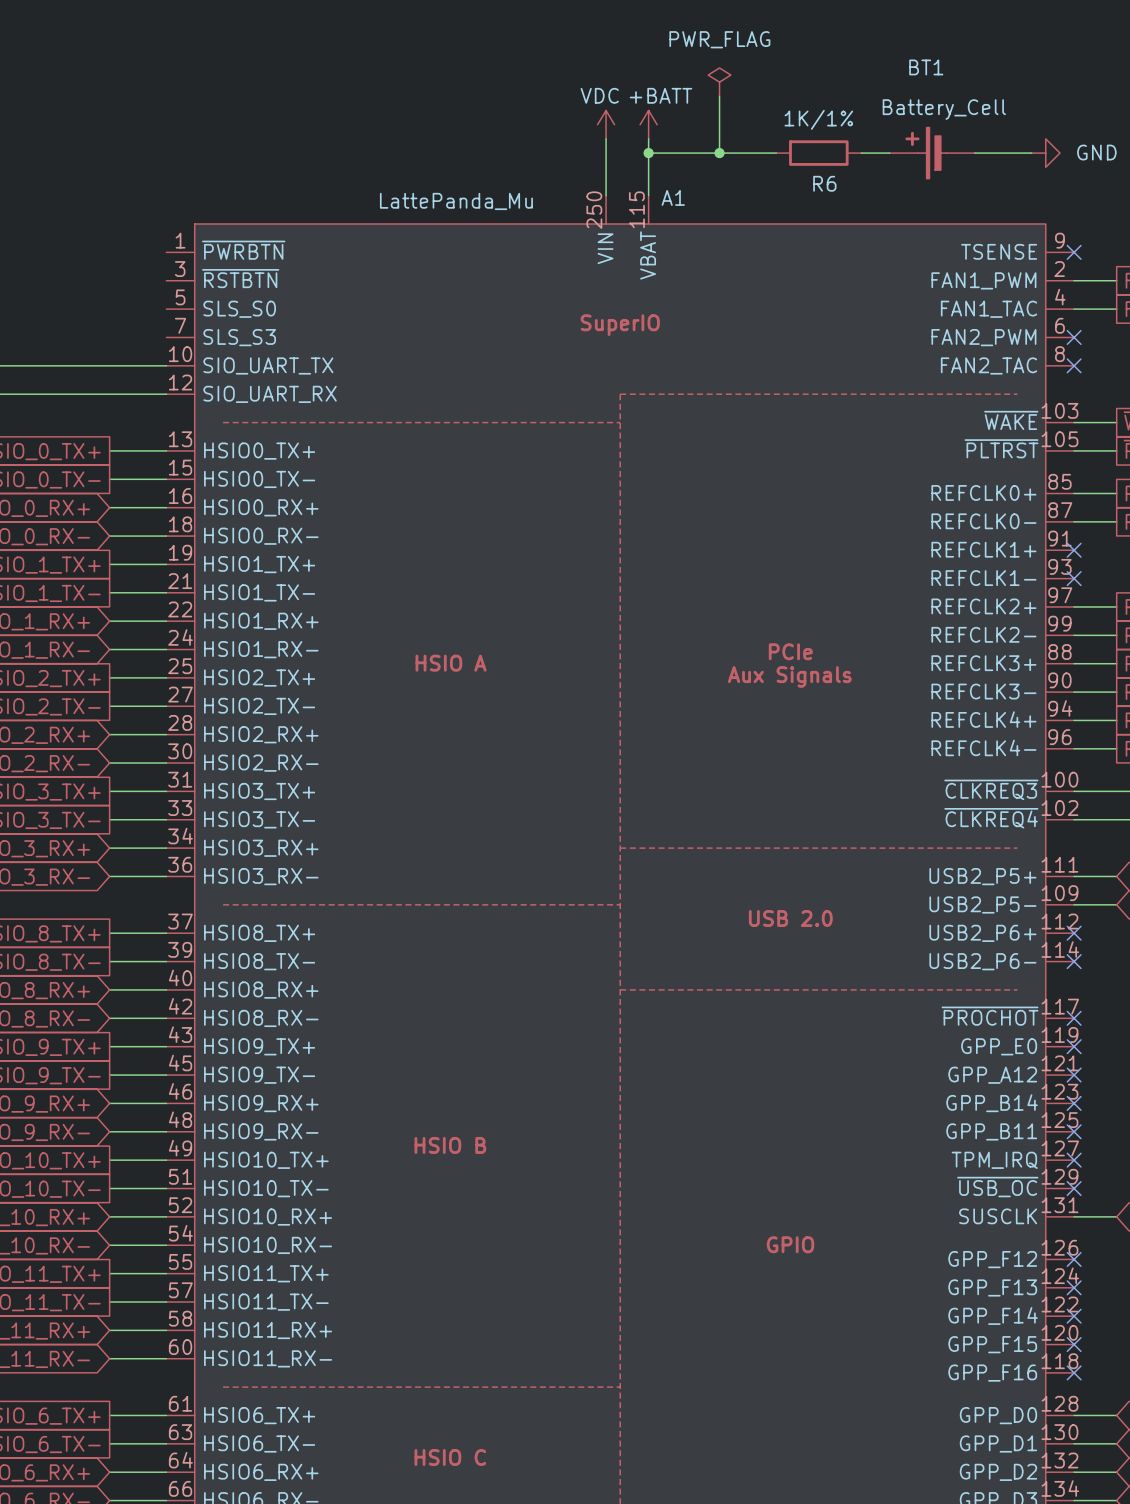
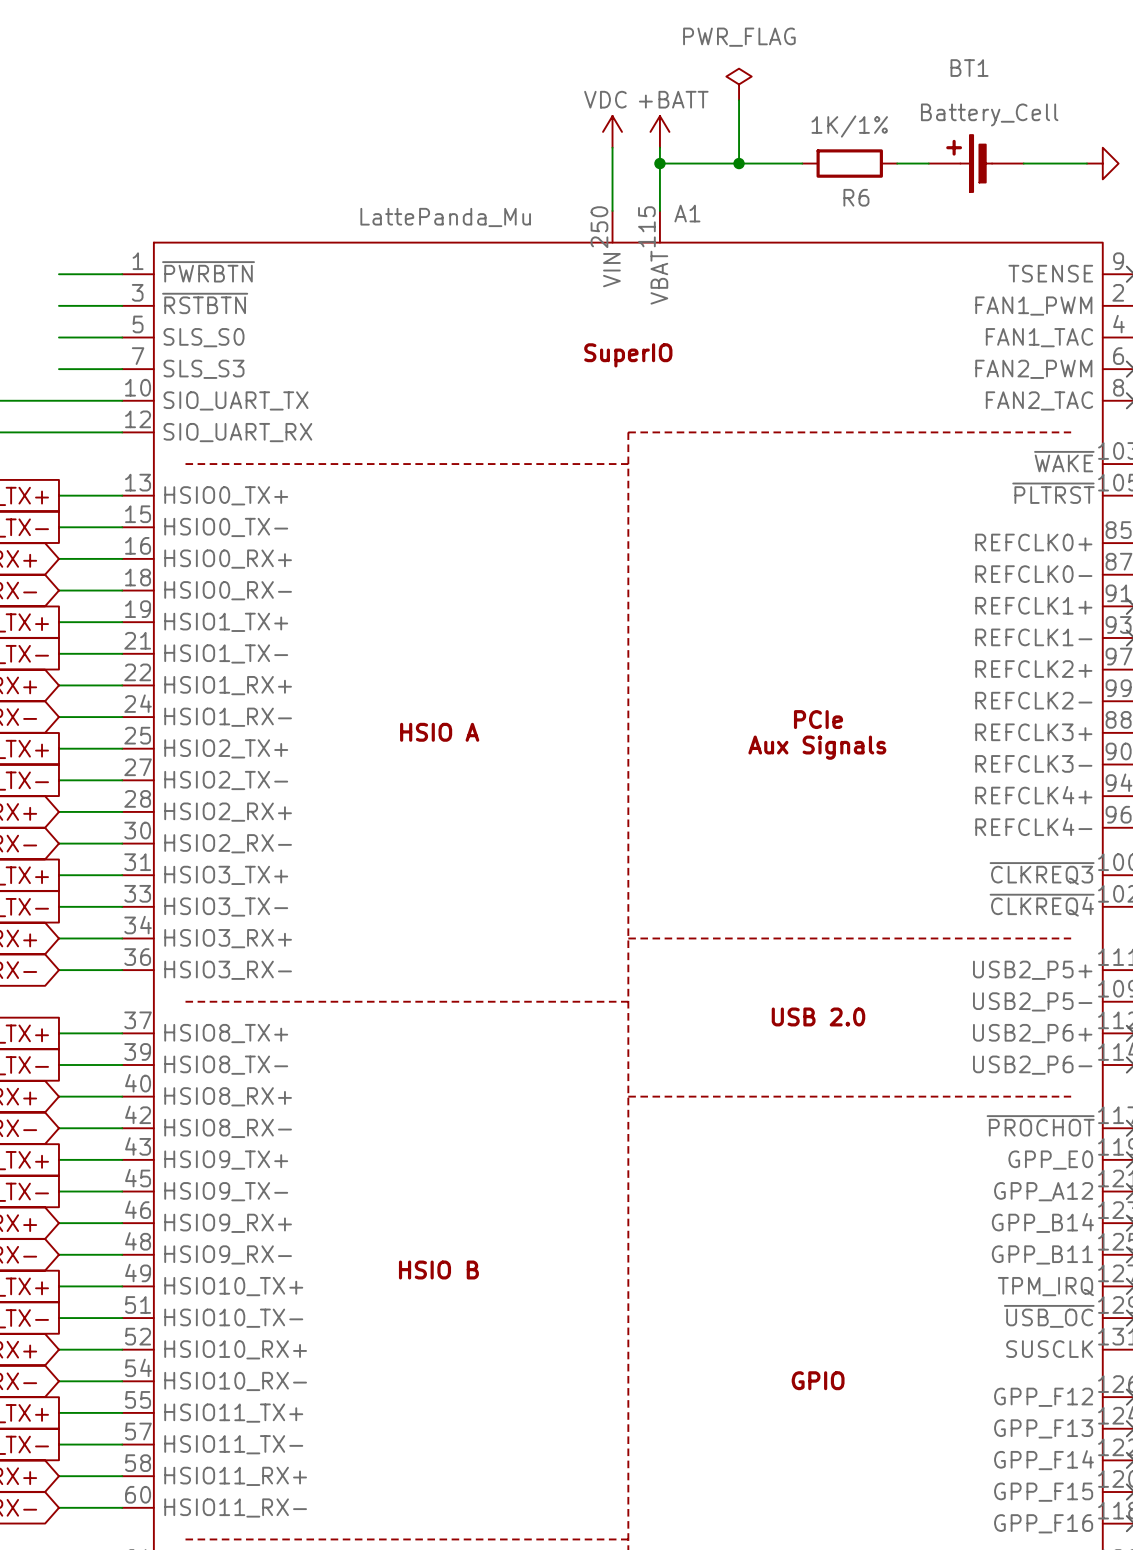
wire: none -> (58, 274) (122, 274)
wire: none -> (58, 305) (122, 305)
wire: none -> (58, 337) (122, 337)
wire: none -> (58, 369) (122, 369)

